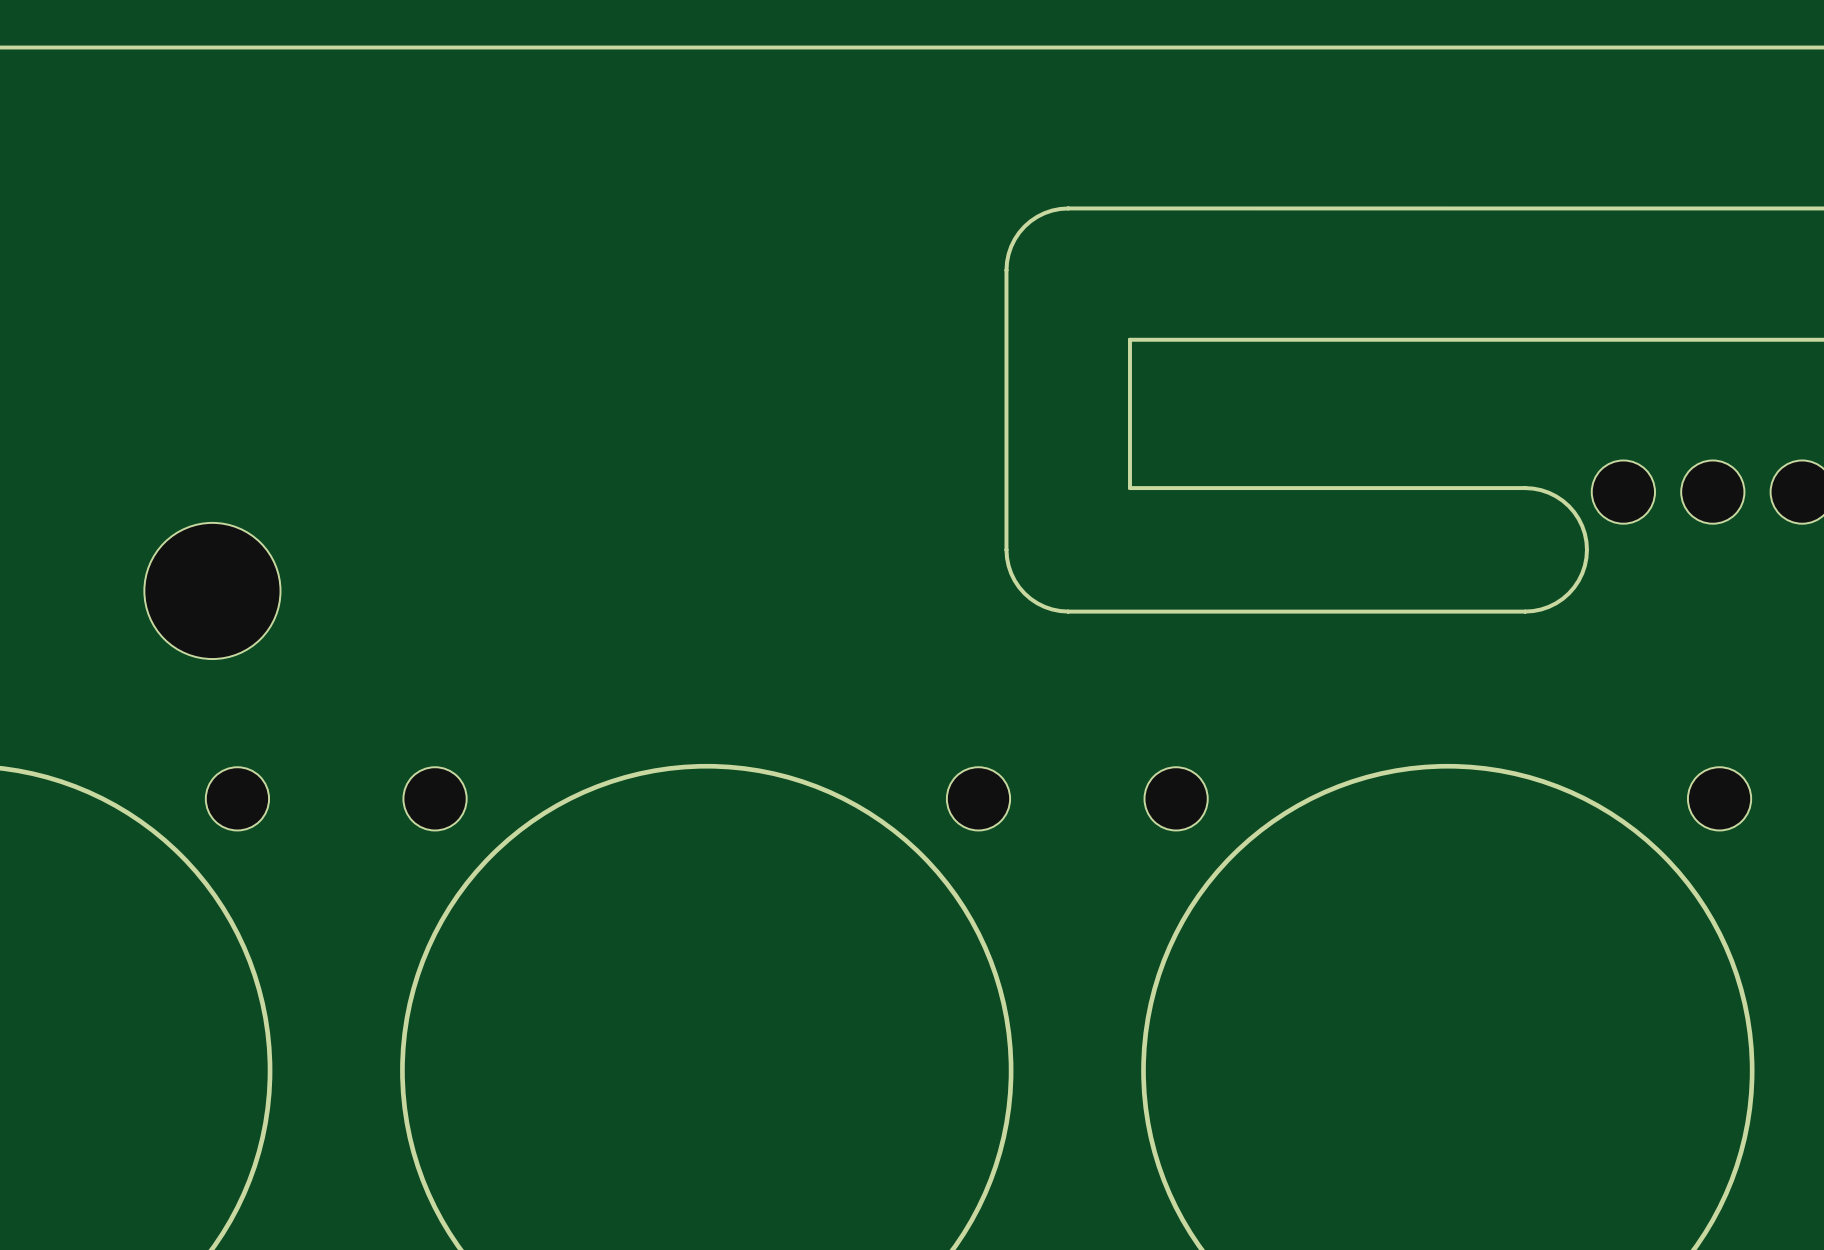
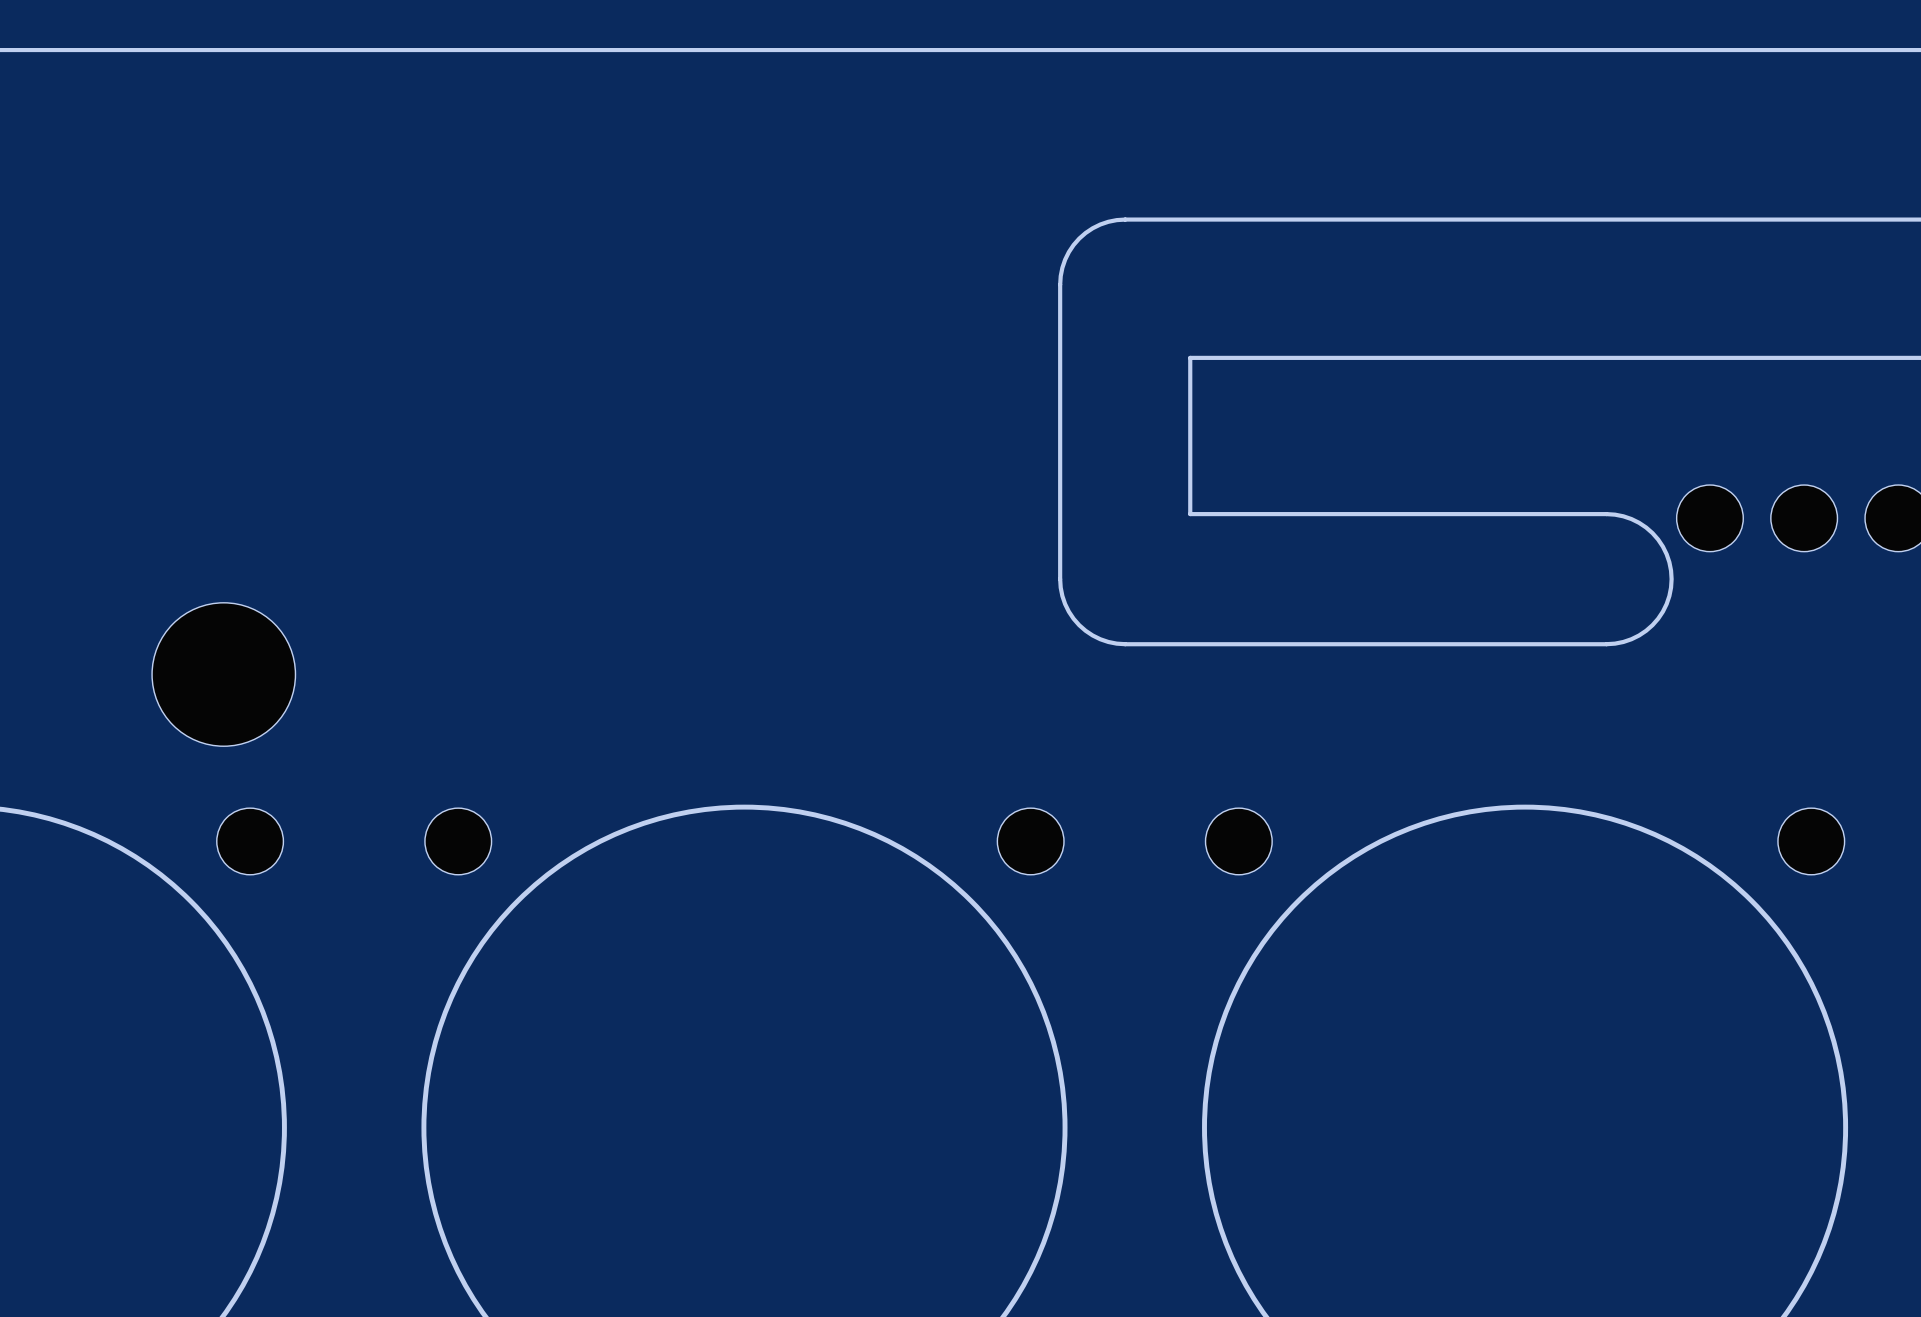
part position: (212, 590) -> (223, 674)

